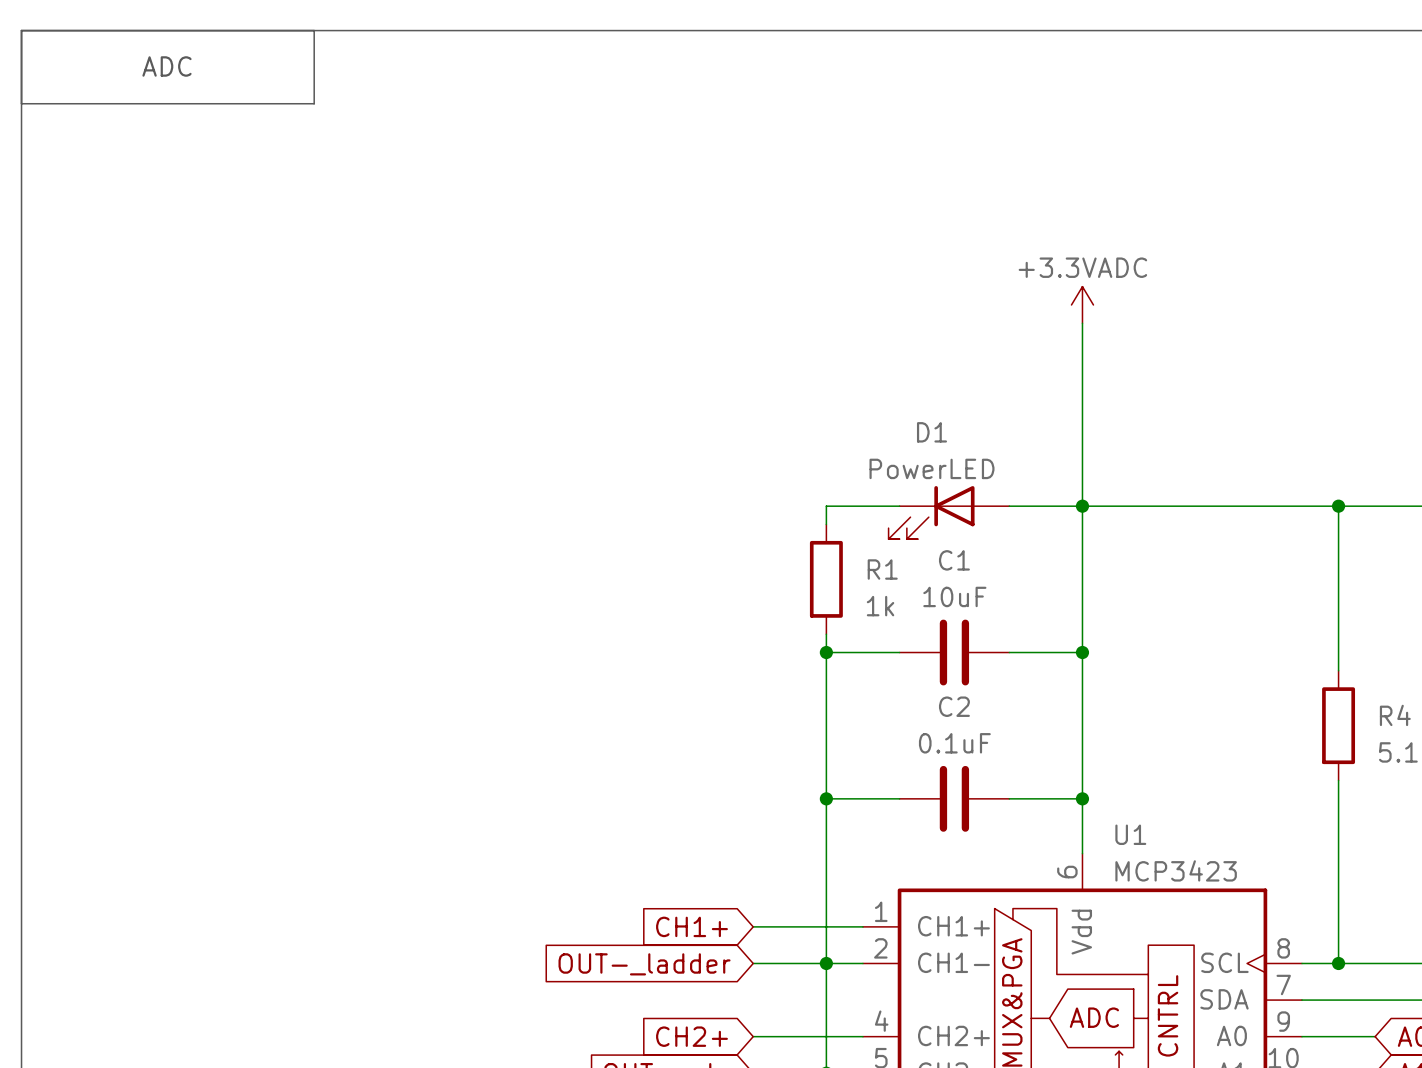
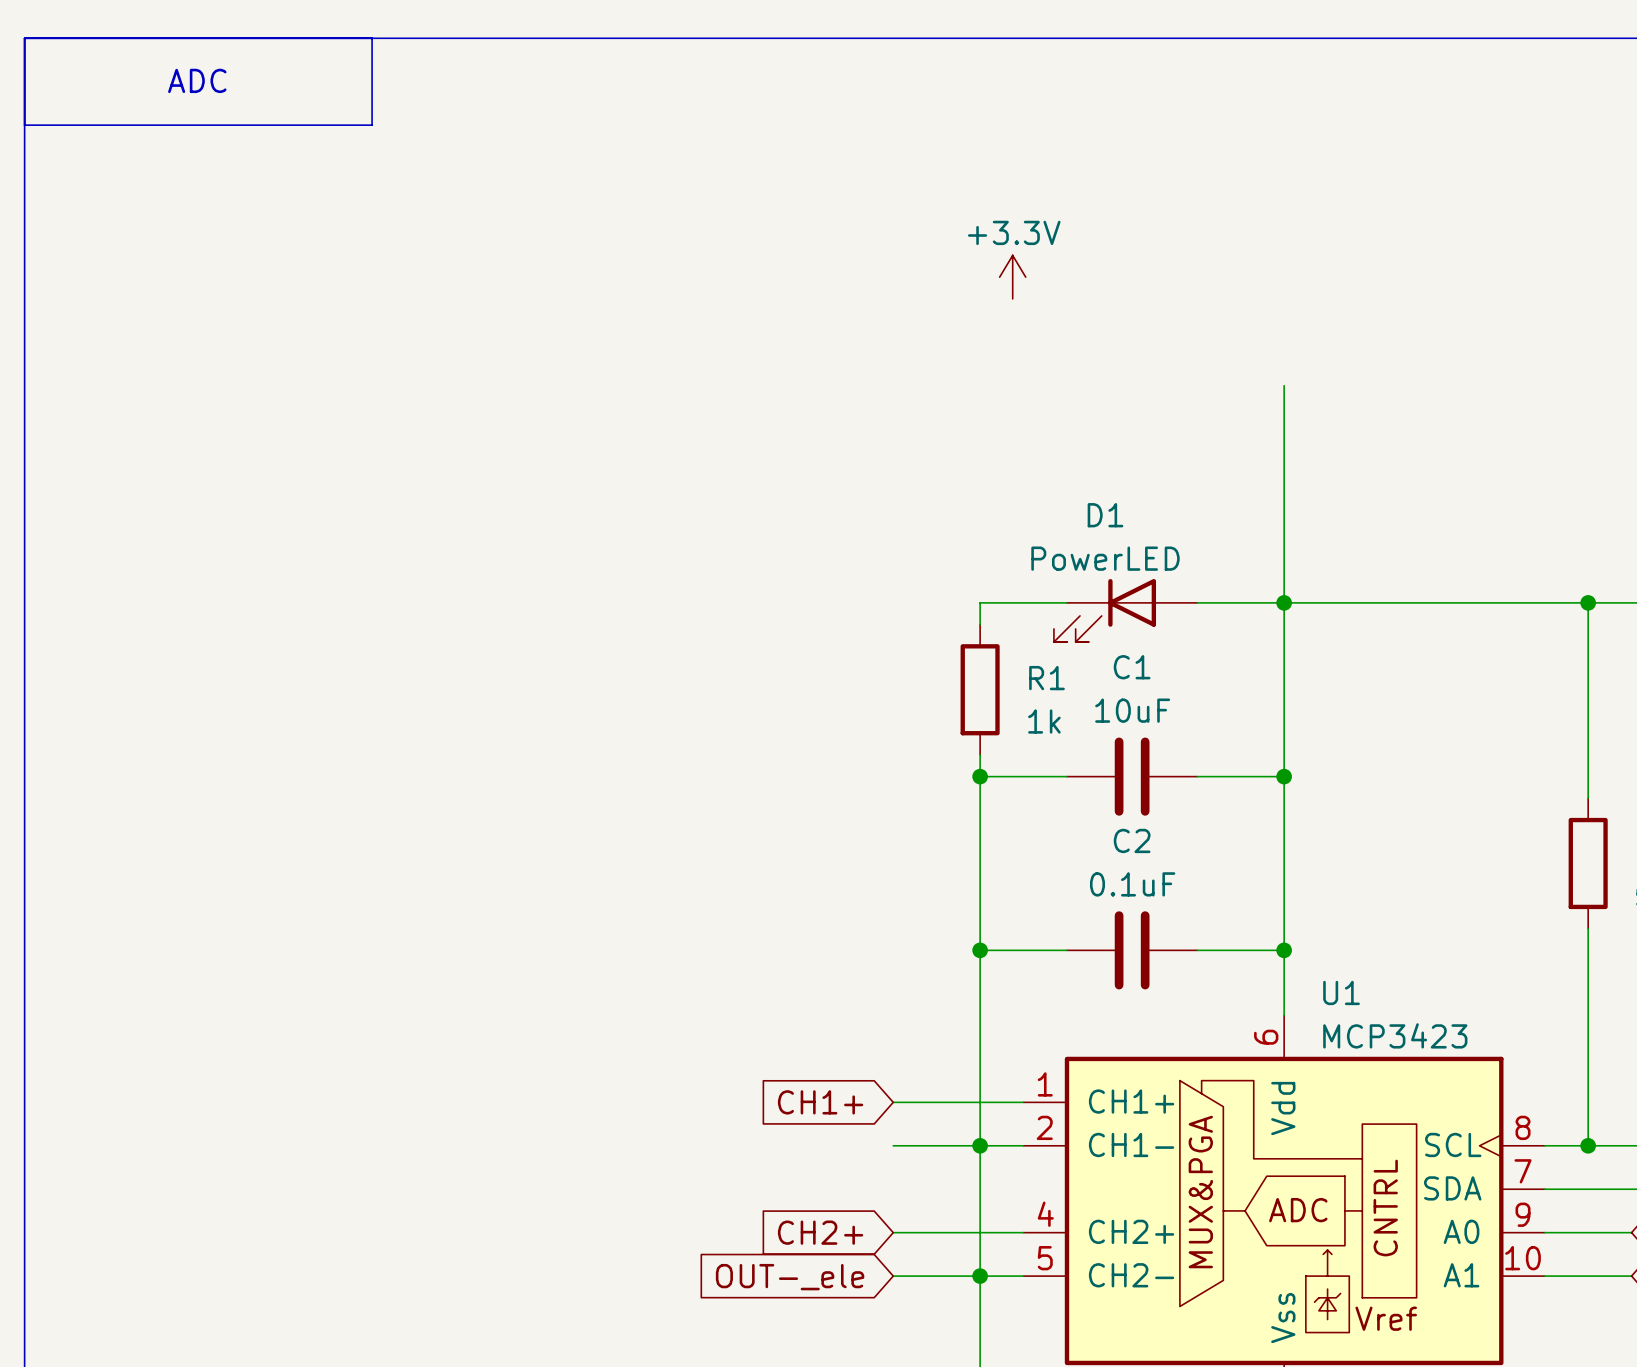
power symbol: none -> +3.3V (1012, 277)
power symbol: +3.3VADC (1082, 304) -> none
global label: OUT-_ladder (644, 964) -> none

